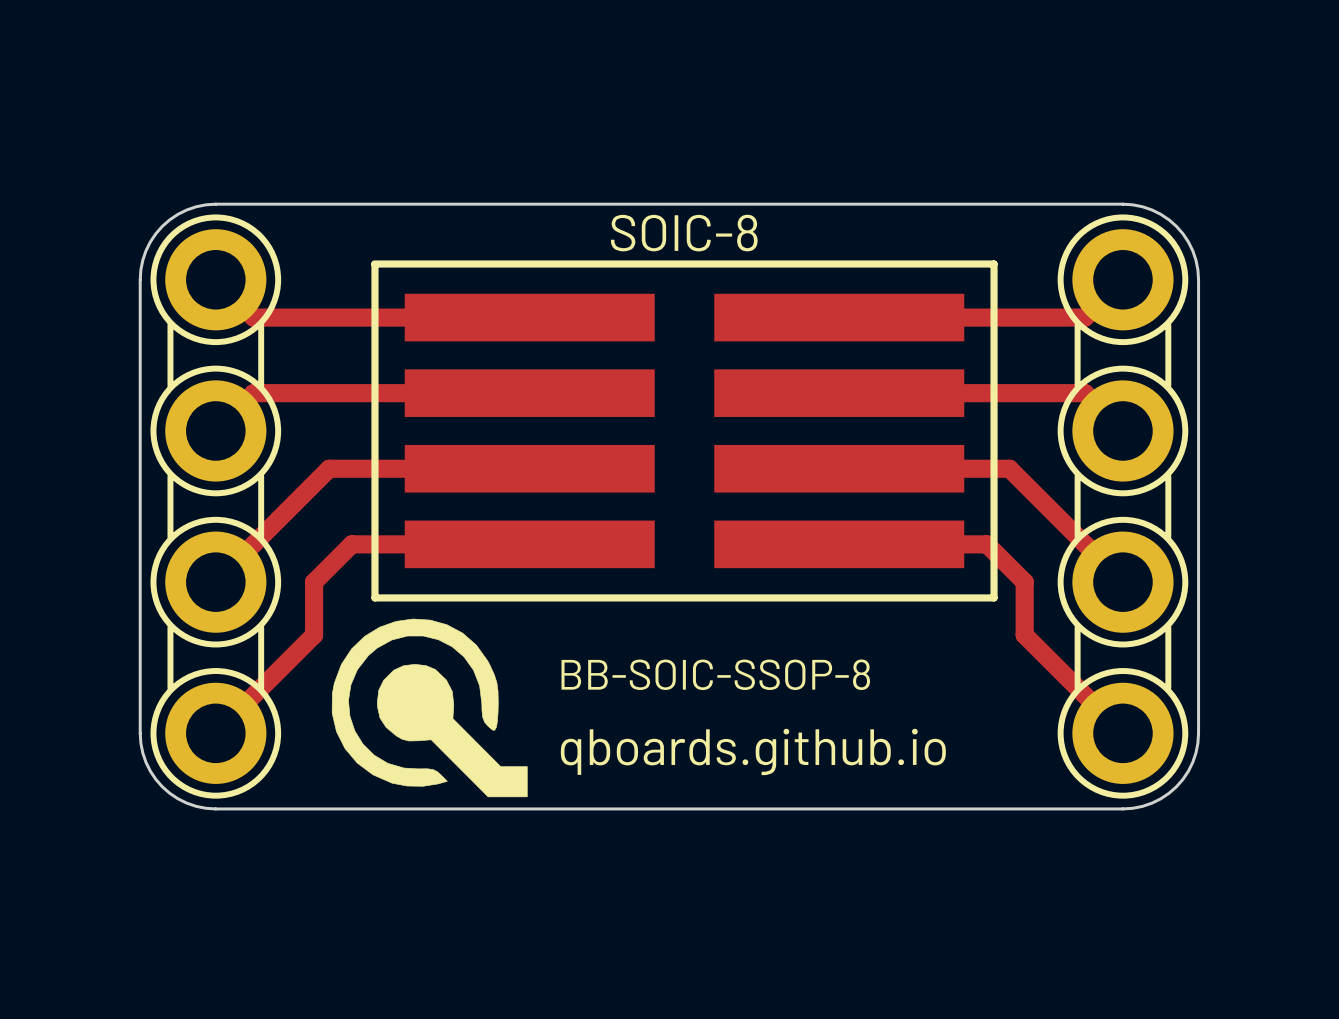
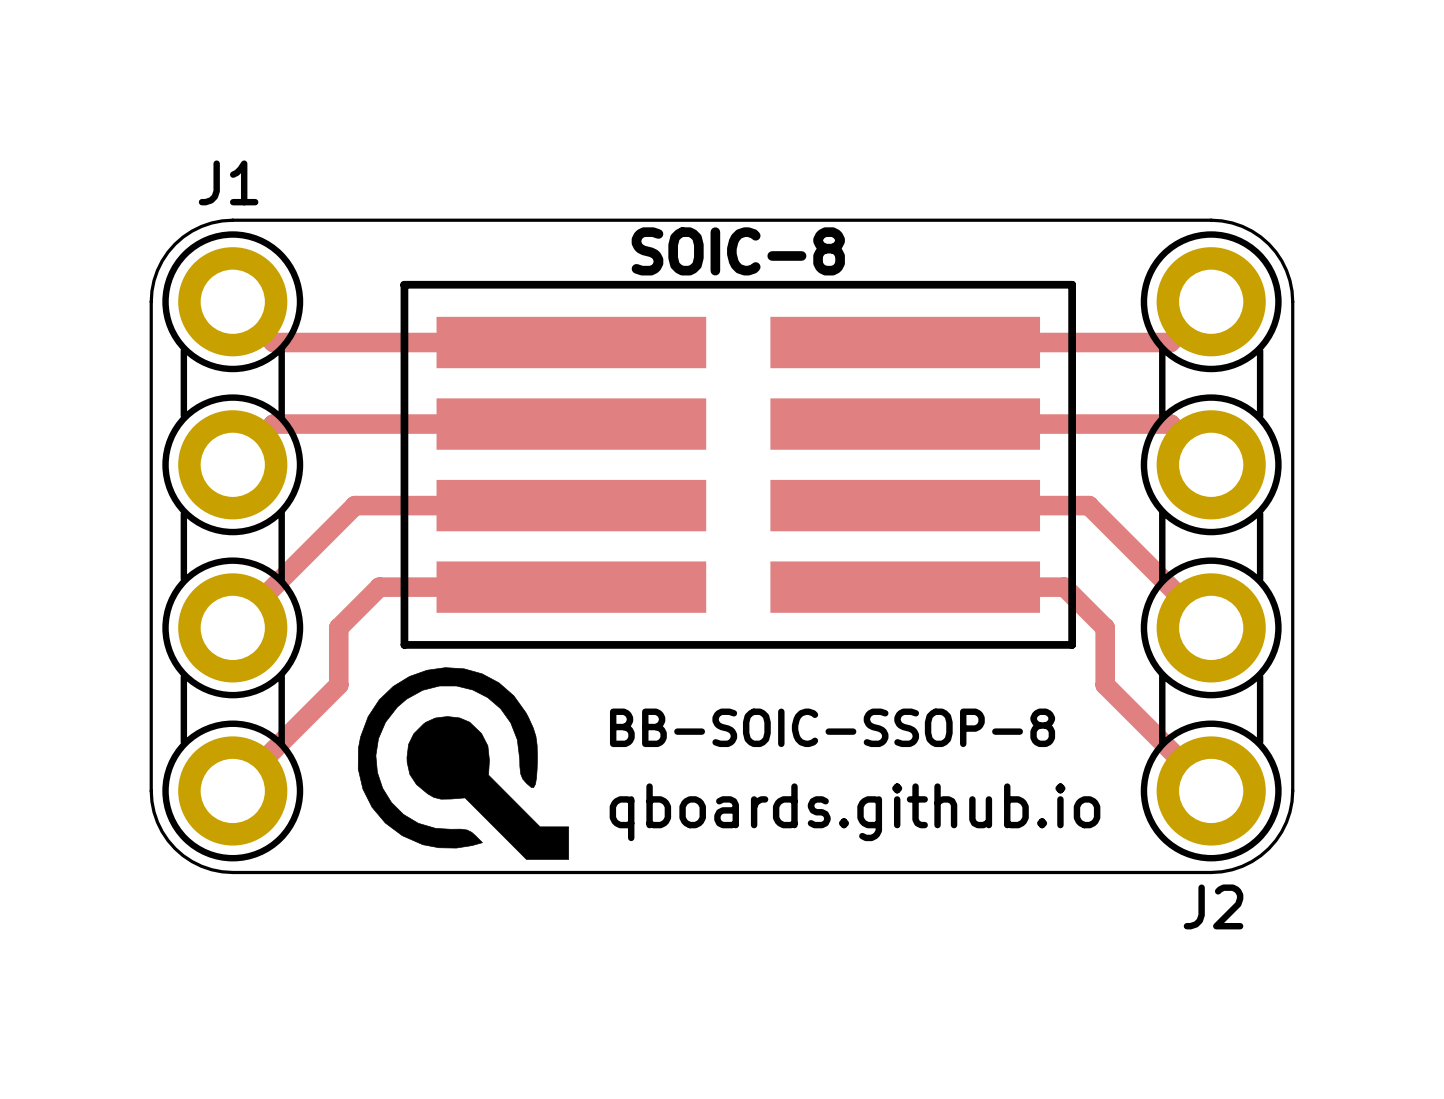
J1 name: none -> J1 (228, 182)
J2 name: none -> J2 (1213, 906)

